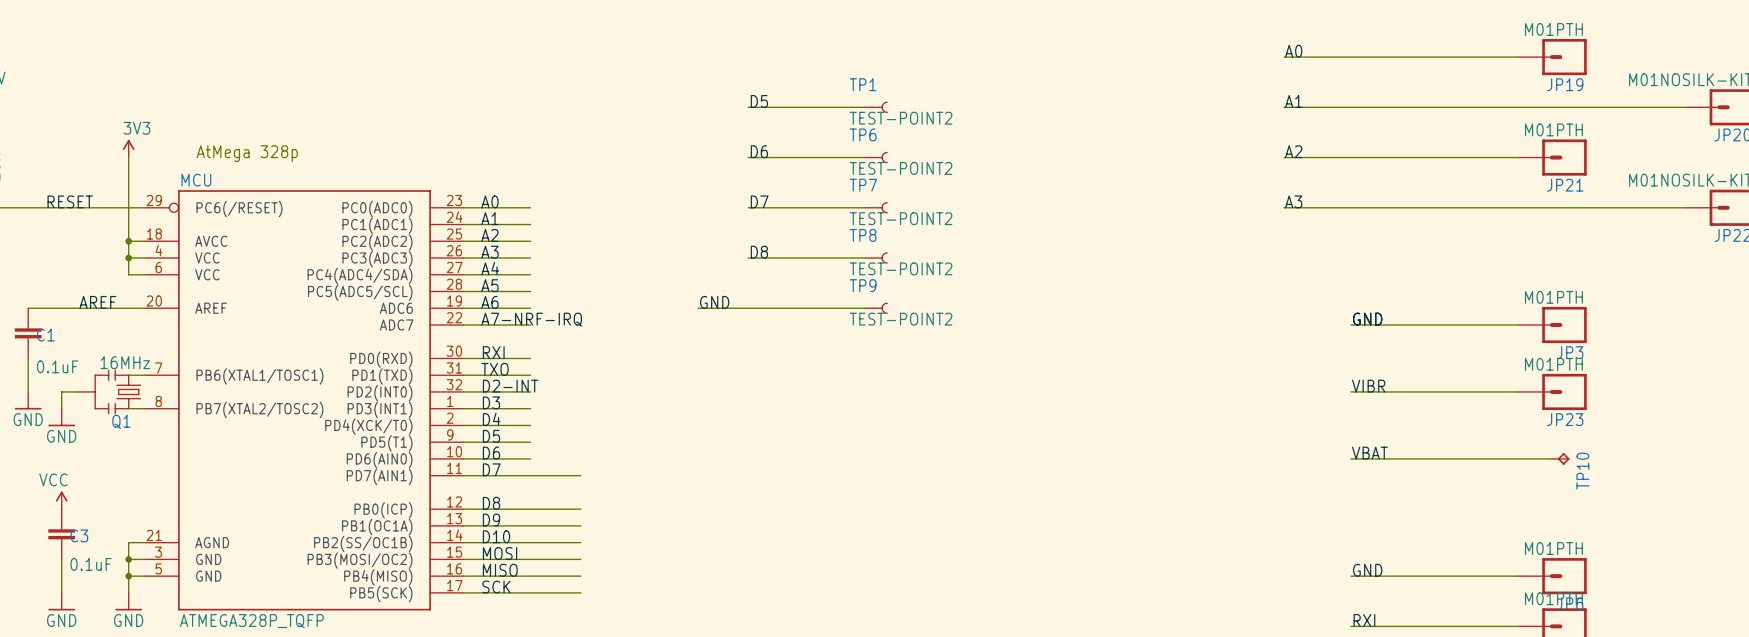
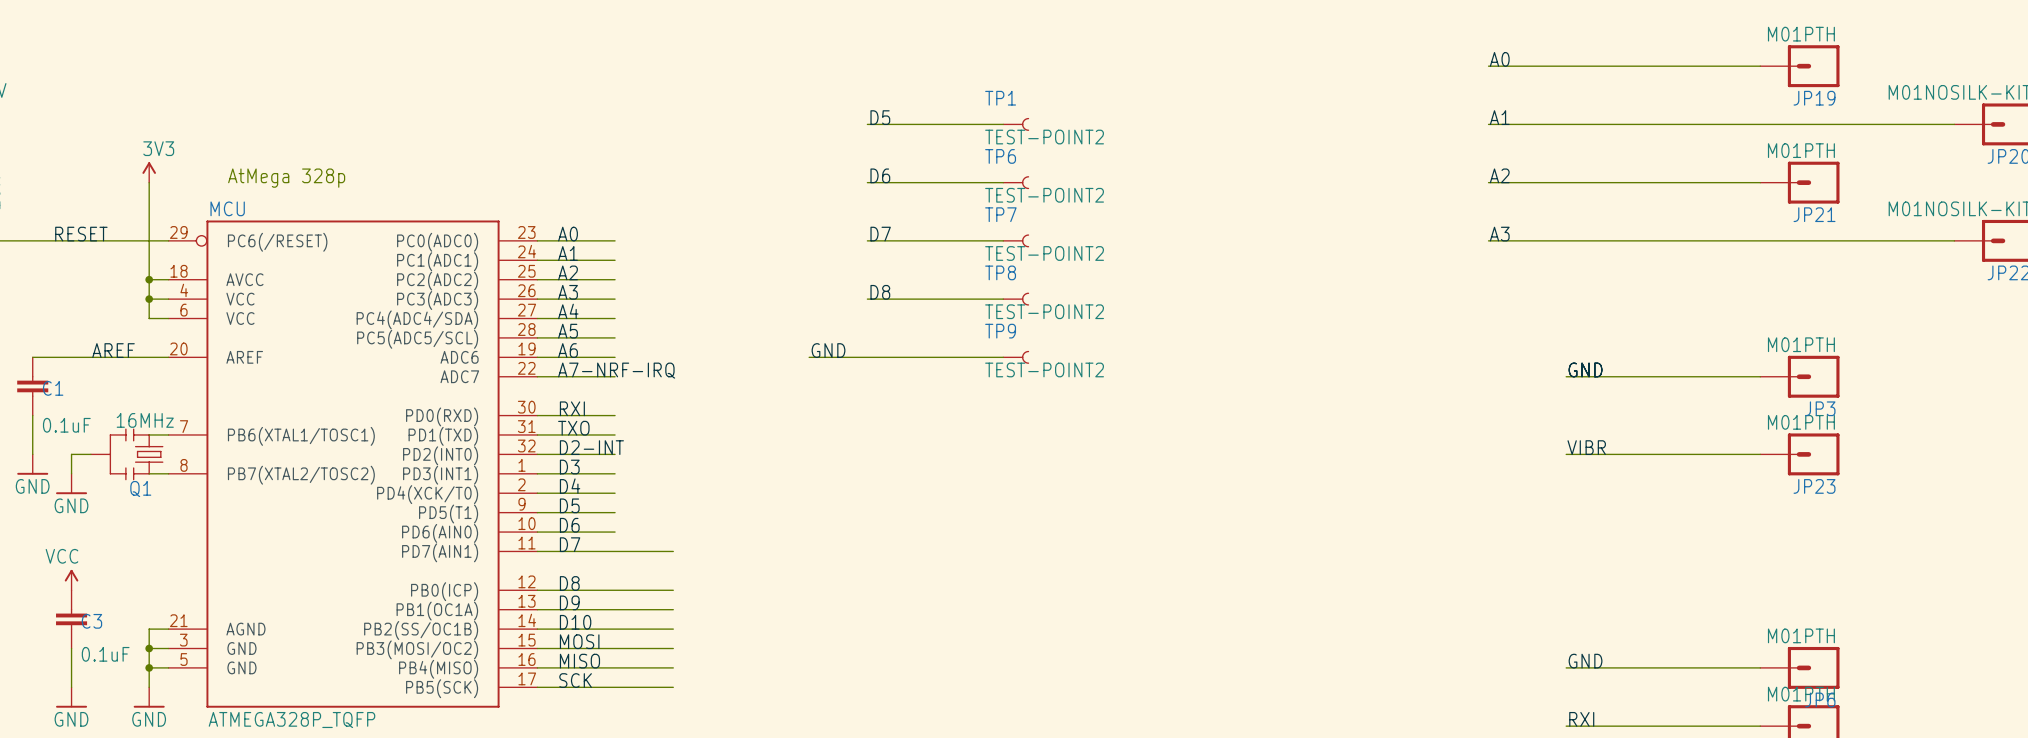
label: VBAT (1369, 453) -> none
wire: (1350, 458) (1551, 458) -> none
TP10: (1560, 458) -> none

